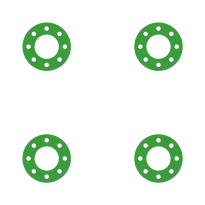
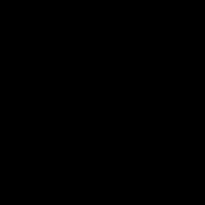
part: (46, 46) -> none
part: (158, 46) -> none
part: (46, 158) -> none
part: (158, 158) -> none

